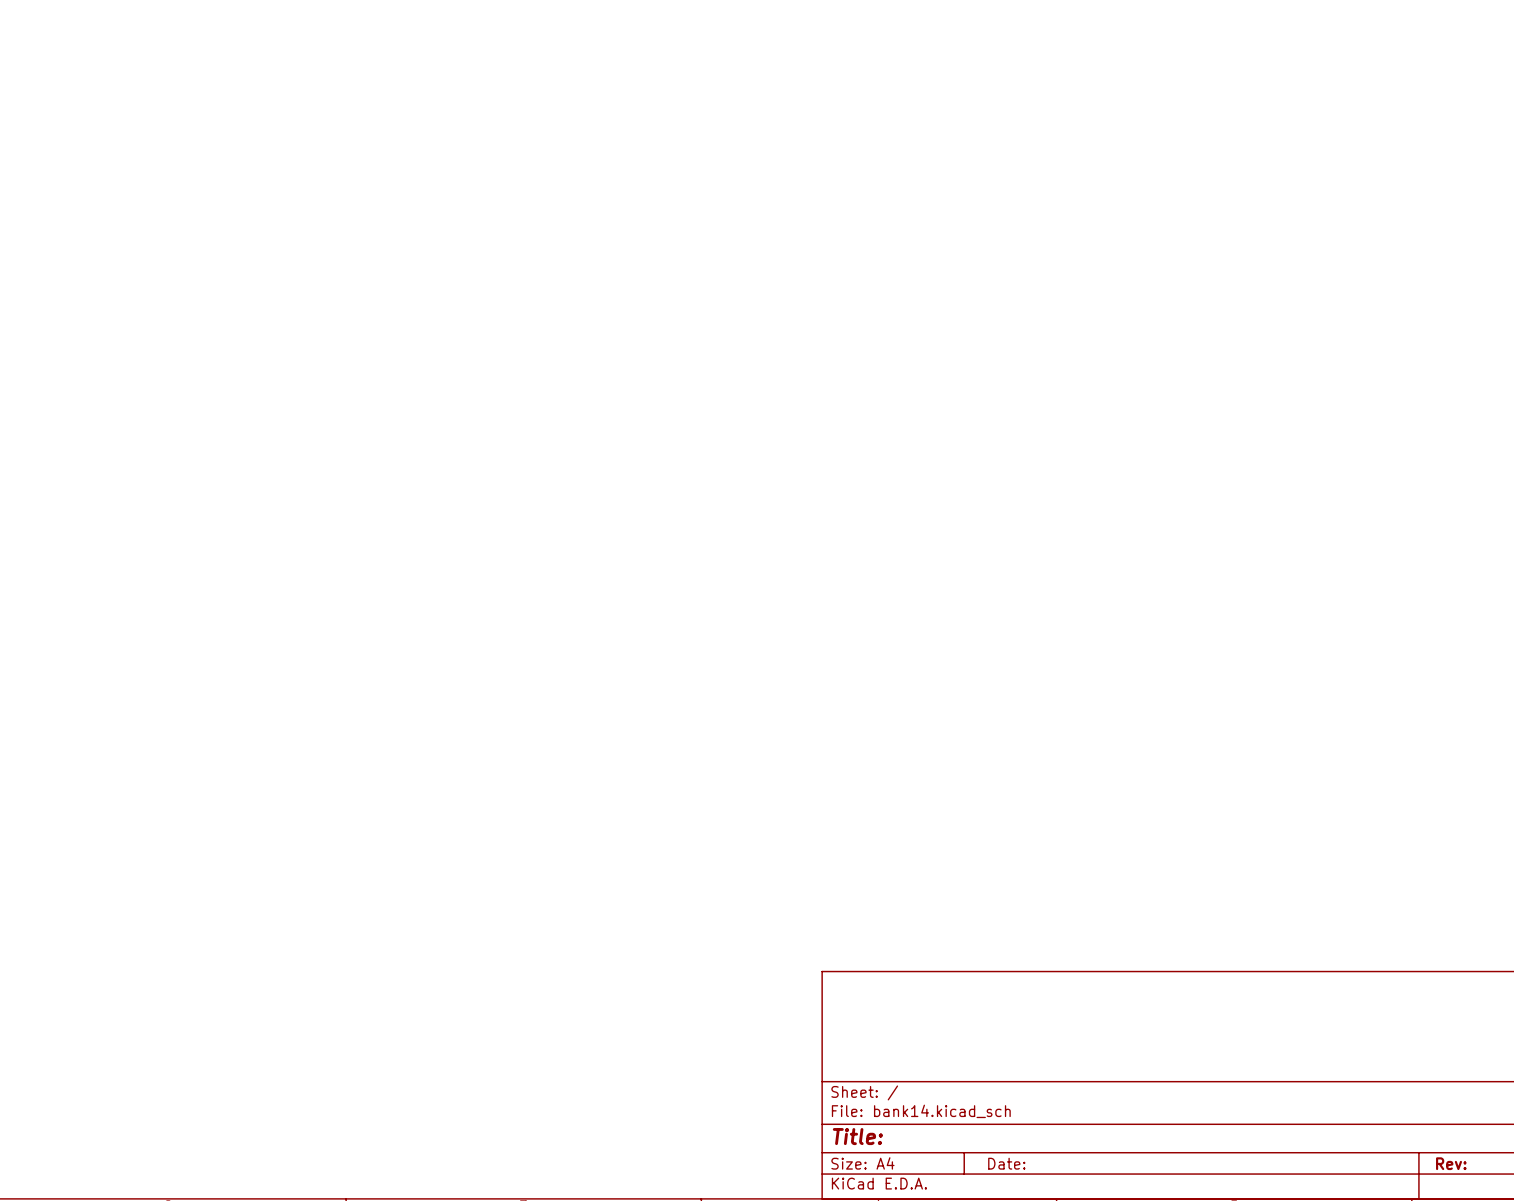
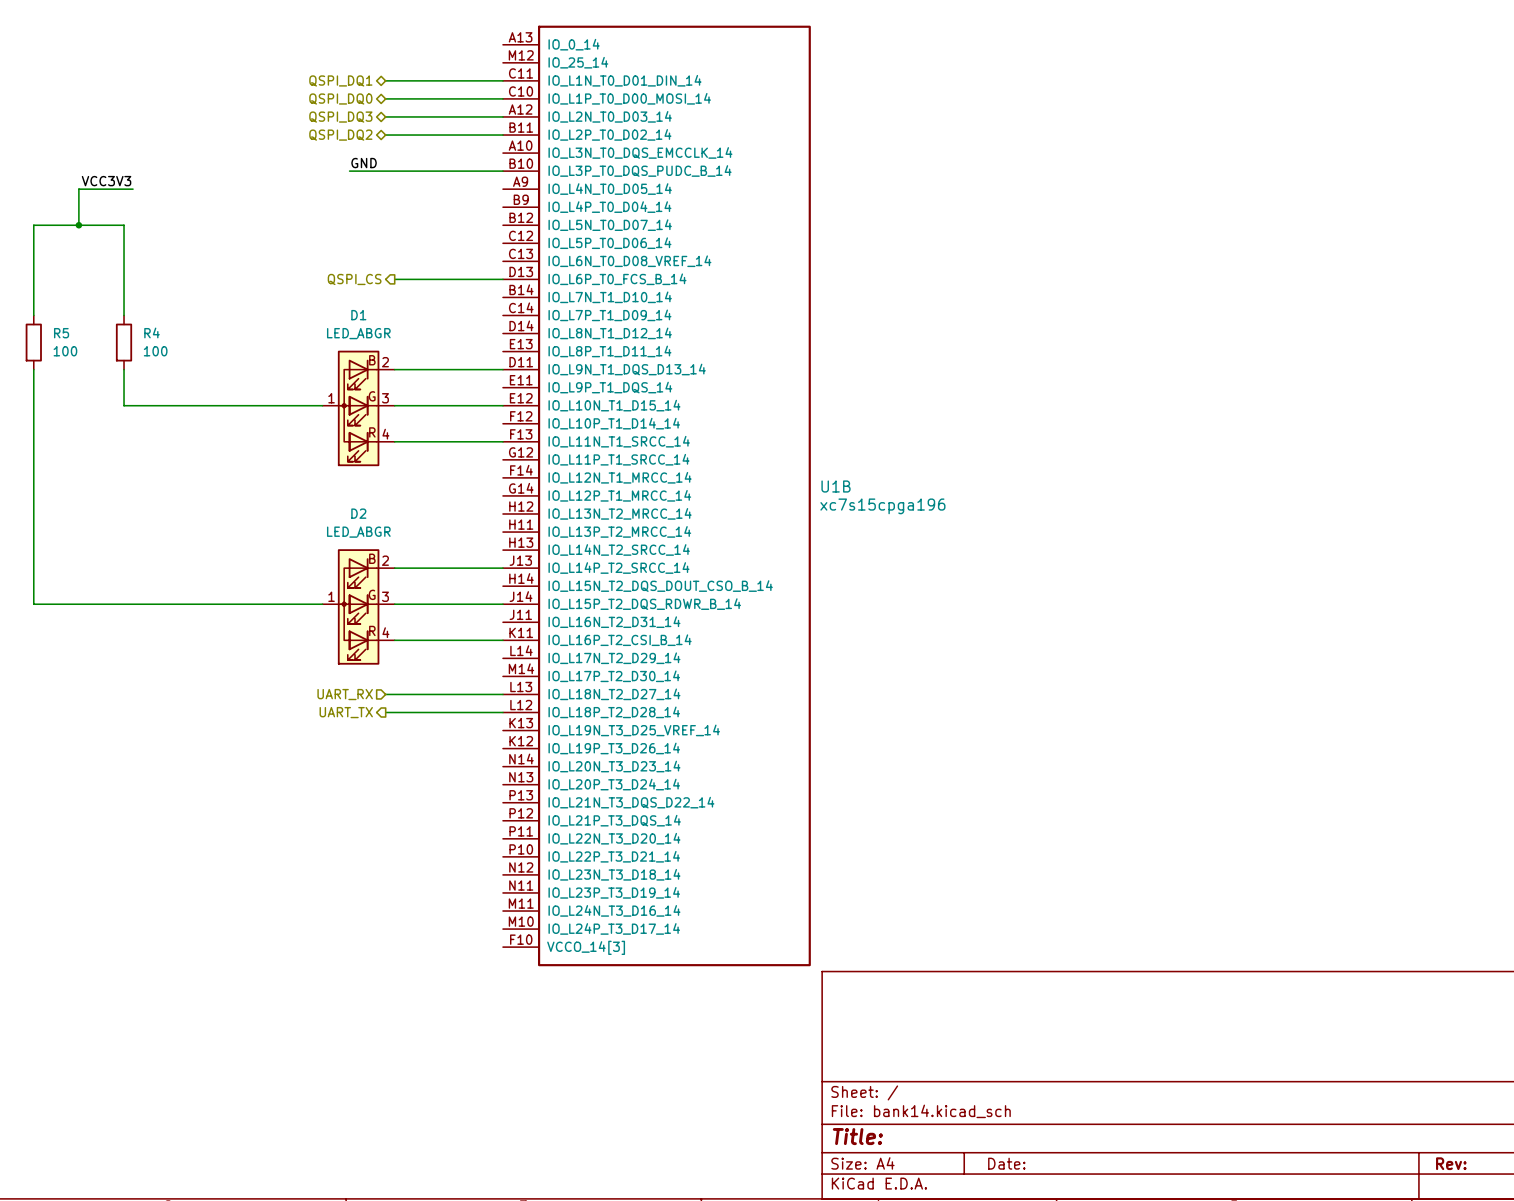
hierarchical label: none -> QSPI_DQ1 (340, 80)
wire: none -> (385, 80) (502, 80)
wire: none -> (385, 98) (502, 98)
hierarchical label: none -> QSPI_DQ0 (340, 99)
wire: none -> (385, 116) (502, 116)
hierarchical label: none -> QSPI_DQ3 (340, 117)
hierarchical label: none -> QSPI_DQ2 (340, 135)
wire: none -> (385, 135) (502, 135)
label: none -> GND (364, 163)
wire: none -> (349, 171) (502, 171)
label: none -> VCC3V3 (106, 181)
wire: none -> (133, 189) (78, 189) (78, 225)
junction: none -> (78, 225)
hierarchical label: none -> QSPI_CS (354, 279)
wire: none -> (394, 279) (502, 279)
wire: none -> (33, 315) (33, 225) (124, 225) (124, 315)
R5: none -> 100 (33, 342)
R4: none -> 100 (124, 342)
wire: none -> (33, 369) (33, 604) (322, 604)
wire: none -> (124, 369) (124, 405) (322, 405)
wire: none -> (394, 369) (502, 369)
wire: none -> (394, 405) (502, 405)
D1: none -> LED_ABGR (358, 408)
wire: none -> (394, 441) (502, 441)
U1B: none -> xc7s15cpga196 (656, 495)
wire: none -> (394, 568) (502, 568)
wire: none -> (394, 604) (502, 604)
D2: none -> LED_ABGR (358, 606)
wire: none -> (394, 640) (502, 640)
hierarchical label: none -> UART_RX (345, 694)
wire: none -> (385, 694) (502, 694)
hierarchical label: none -> UART_TX (346, 712)
wire: none -> (385, 712) (502, 712)

